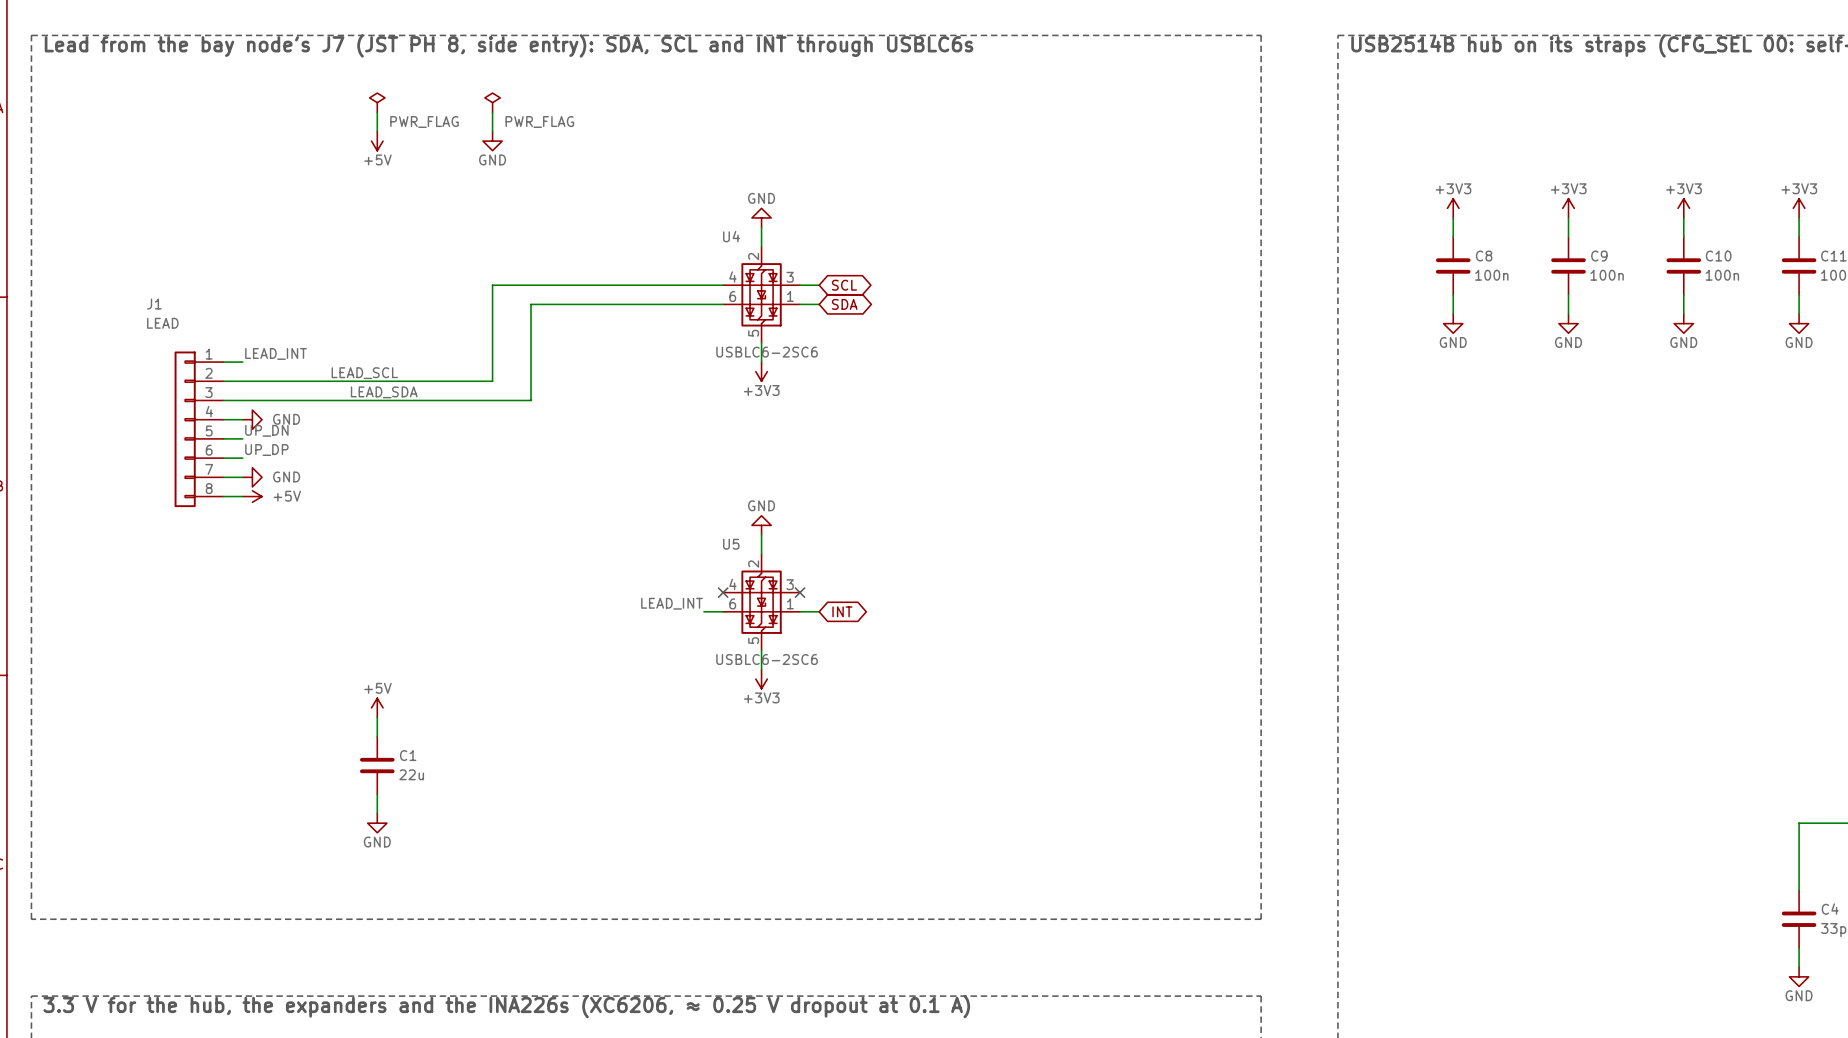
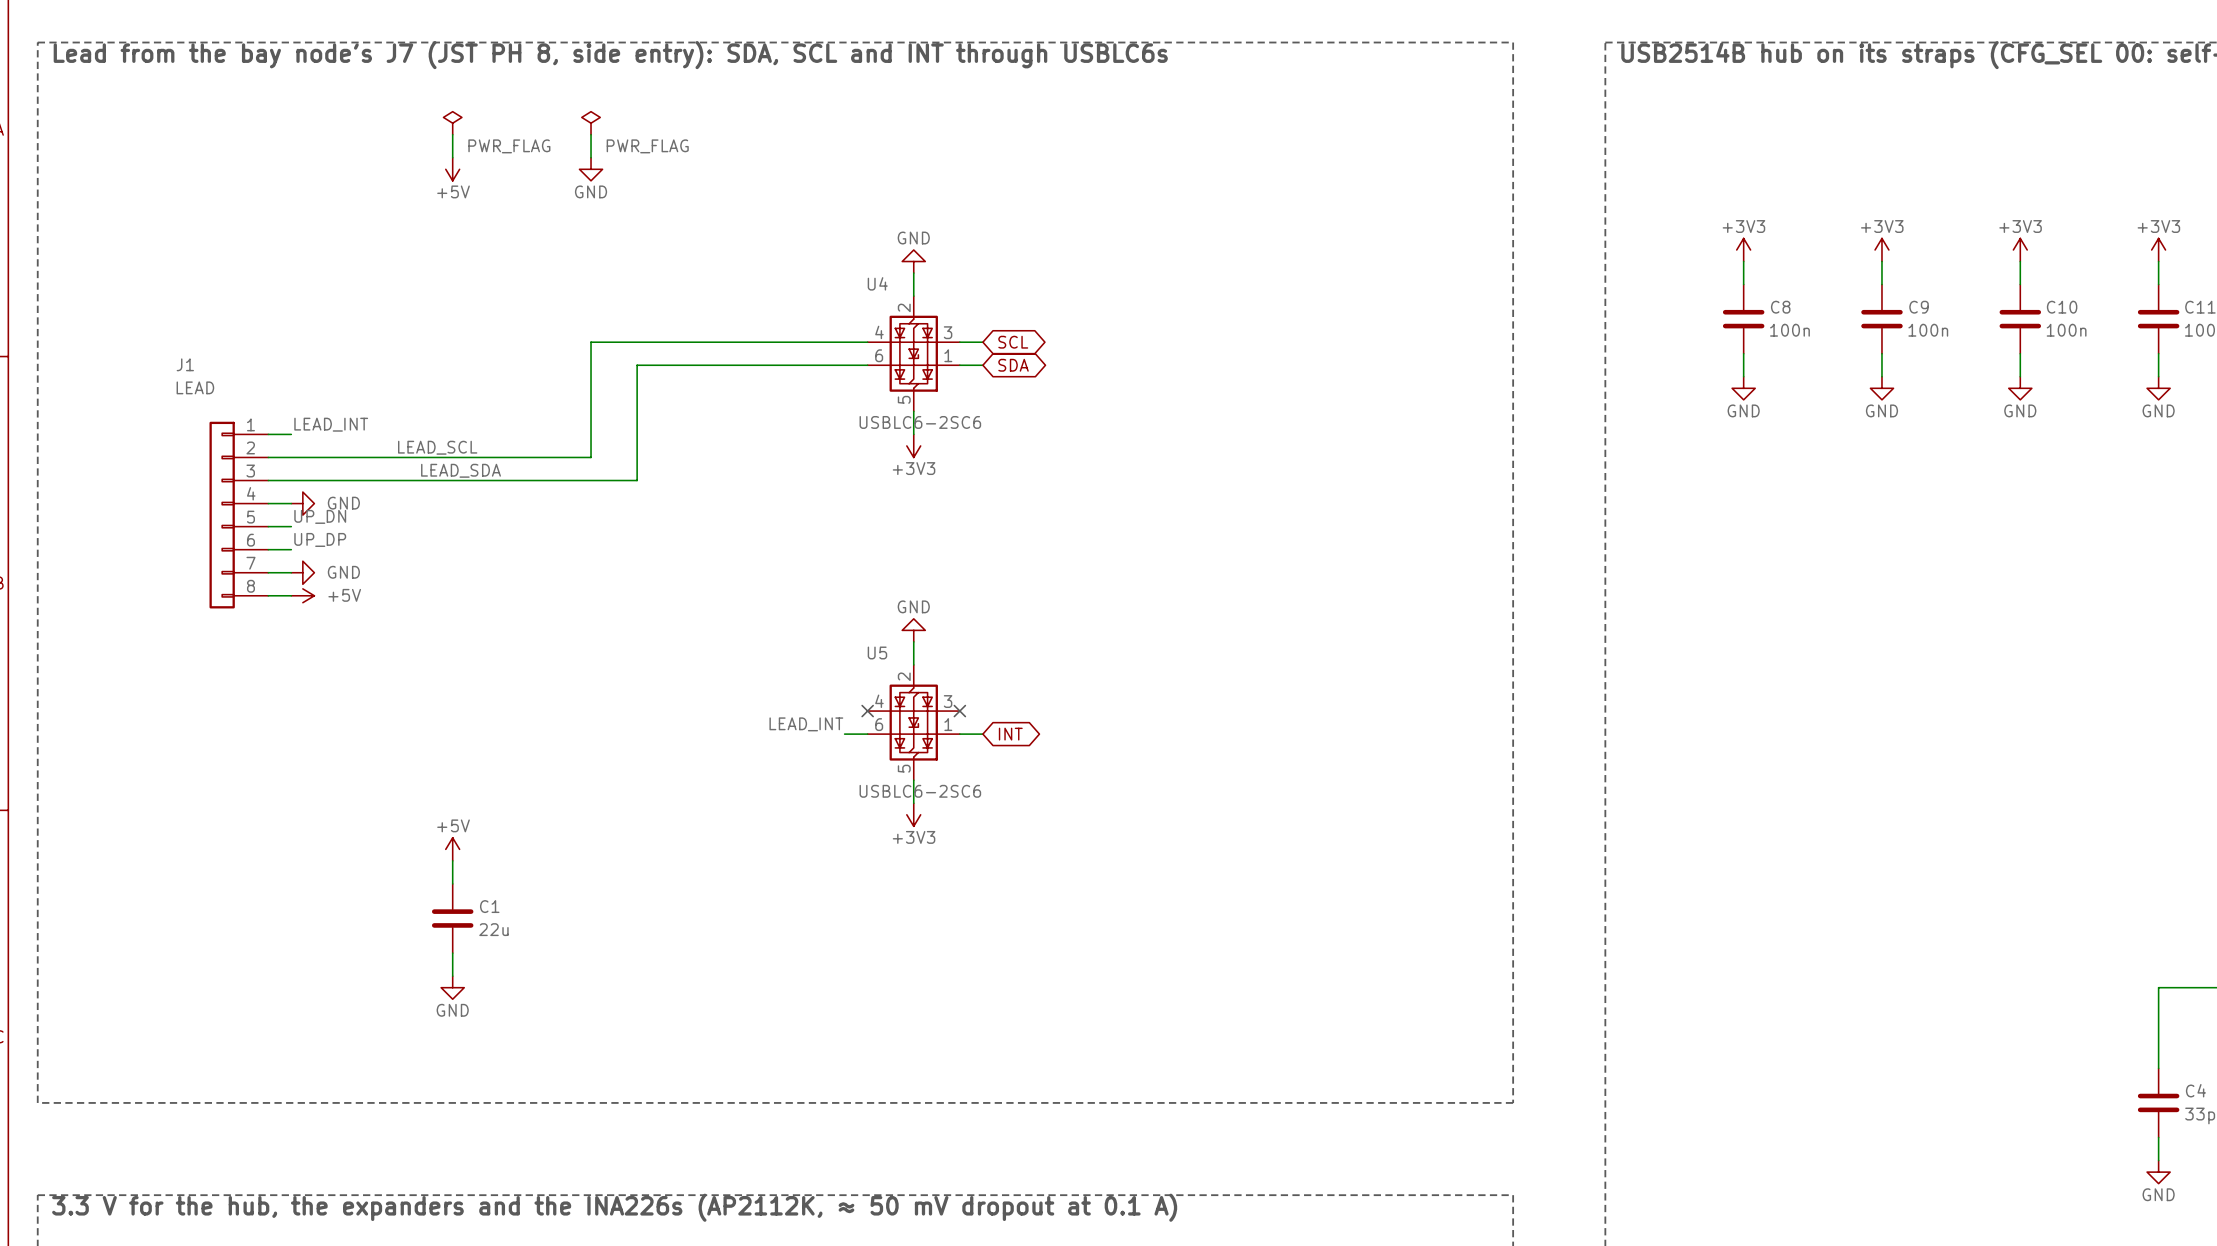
text: 3.3 V for the hub, the expanders and the INA226s (XC6206, ≈ 0.25 V dropout at 0.1 A) (506, 1006) -> 3.3 V for the hub, the expanders and the INA226s (AP2112K, ≈ 50 mV dropout at 0.1 A) (614, 1207)

